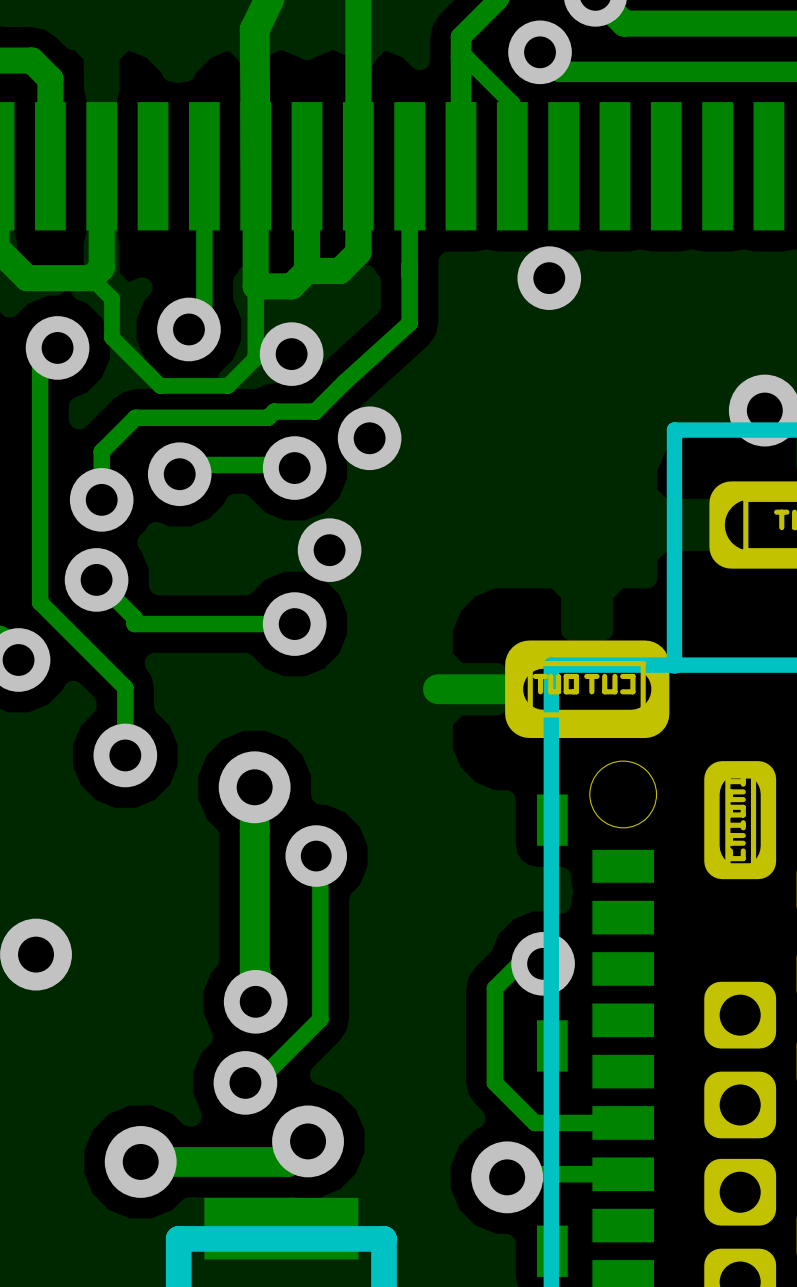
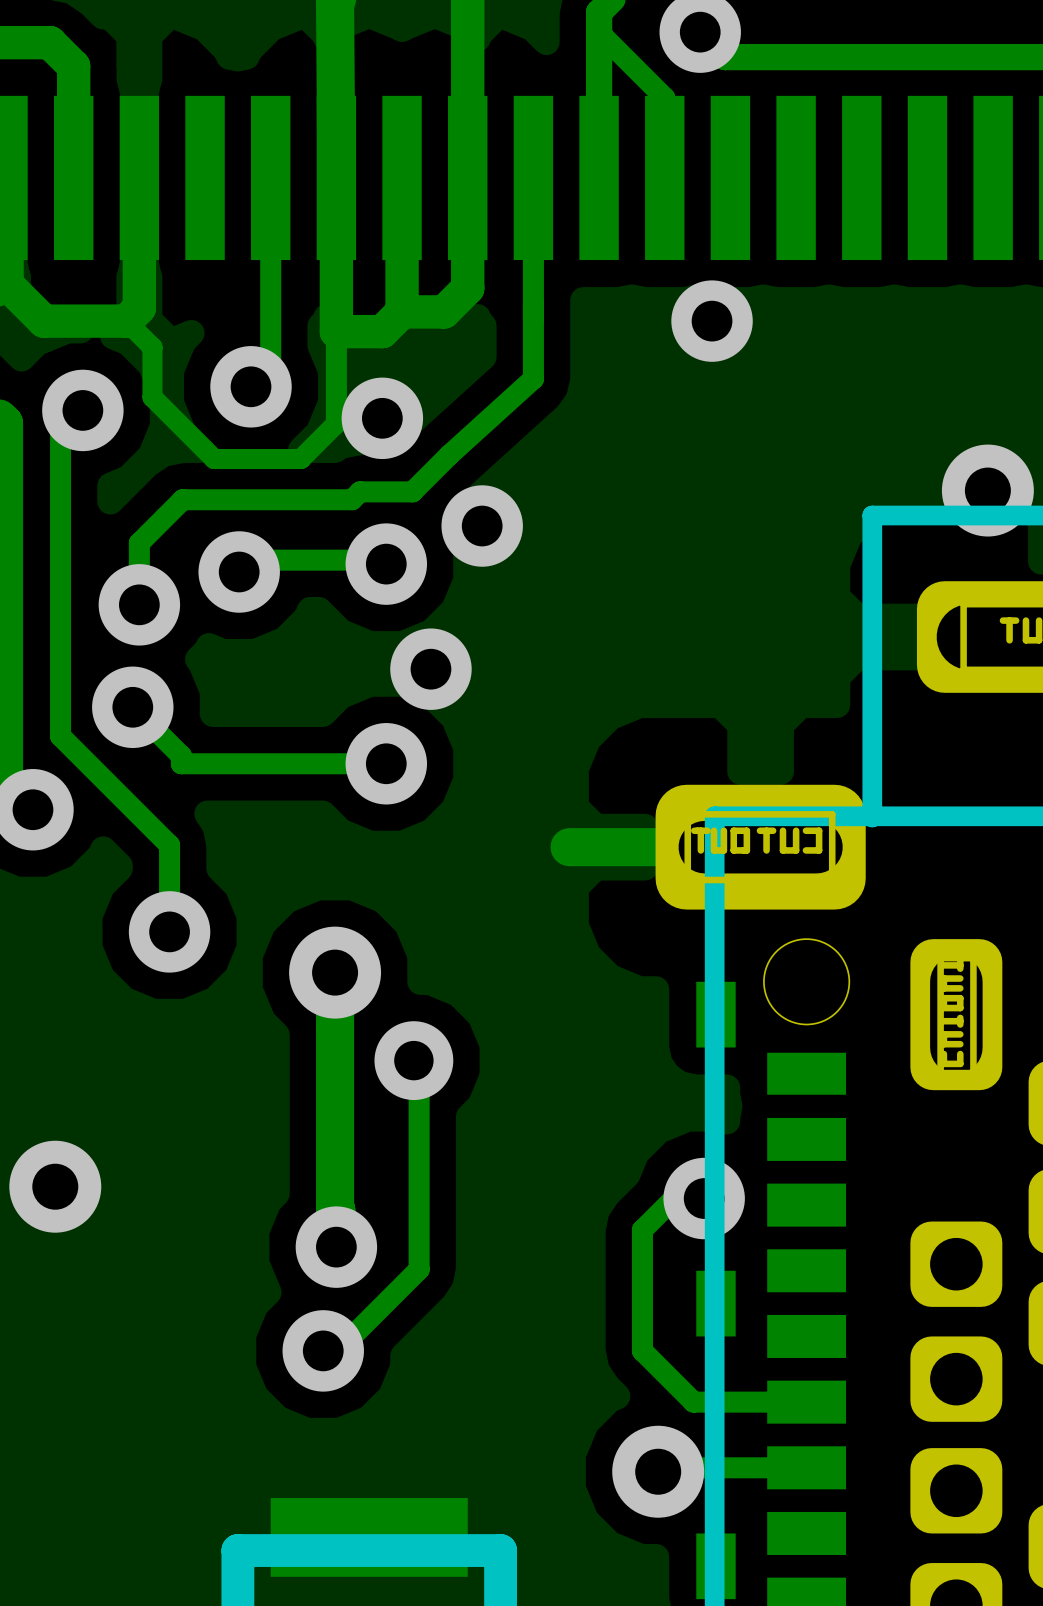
track: (308, 1141) (287, 1161) (140, 1161) -> none
via: (308, 1141) -> none
via: (140, 1161) -> none

